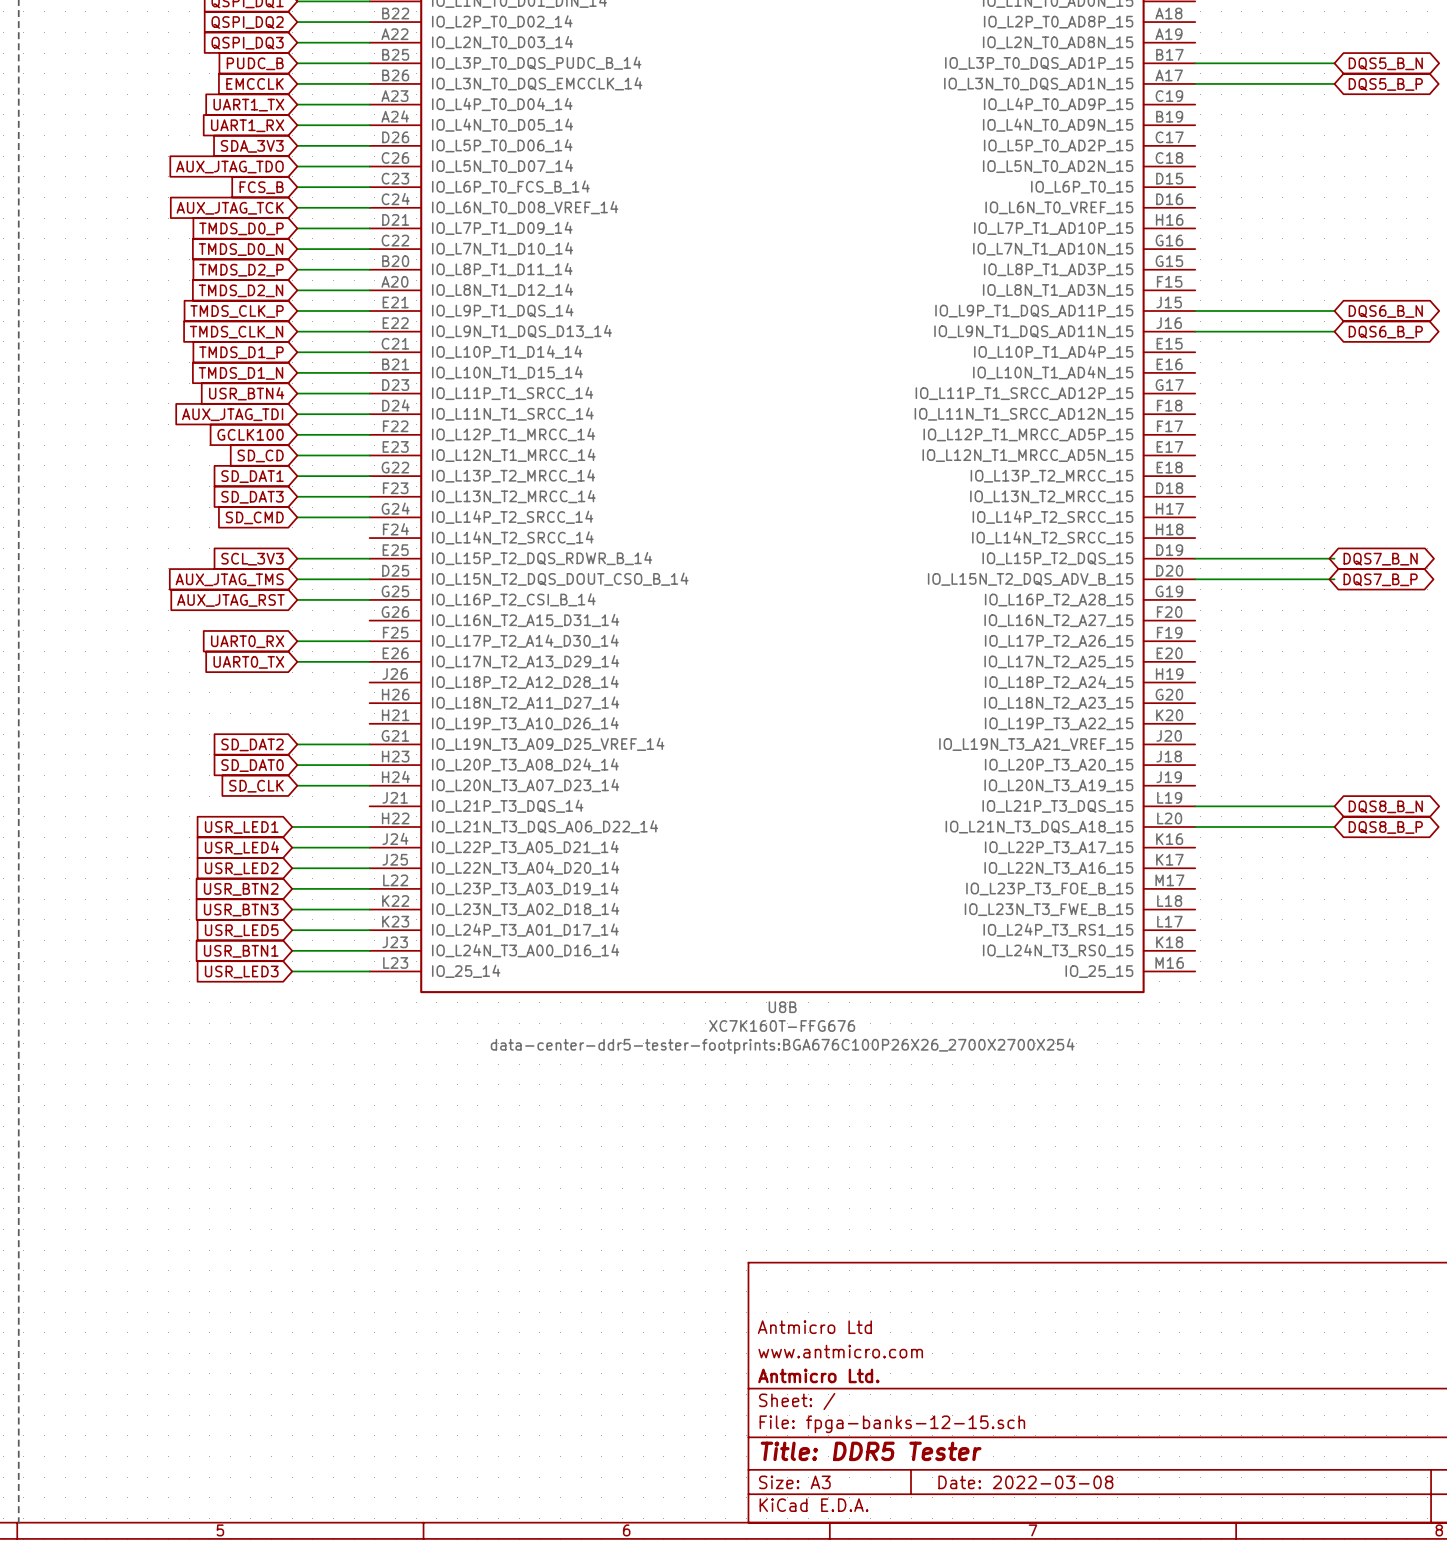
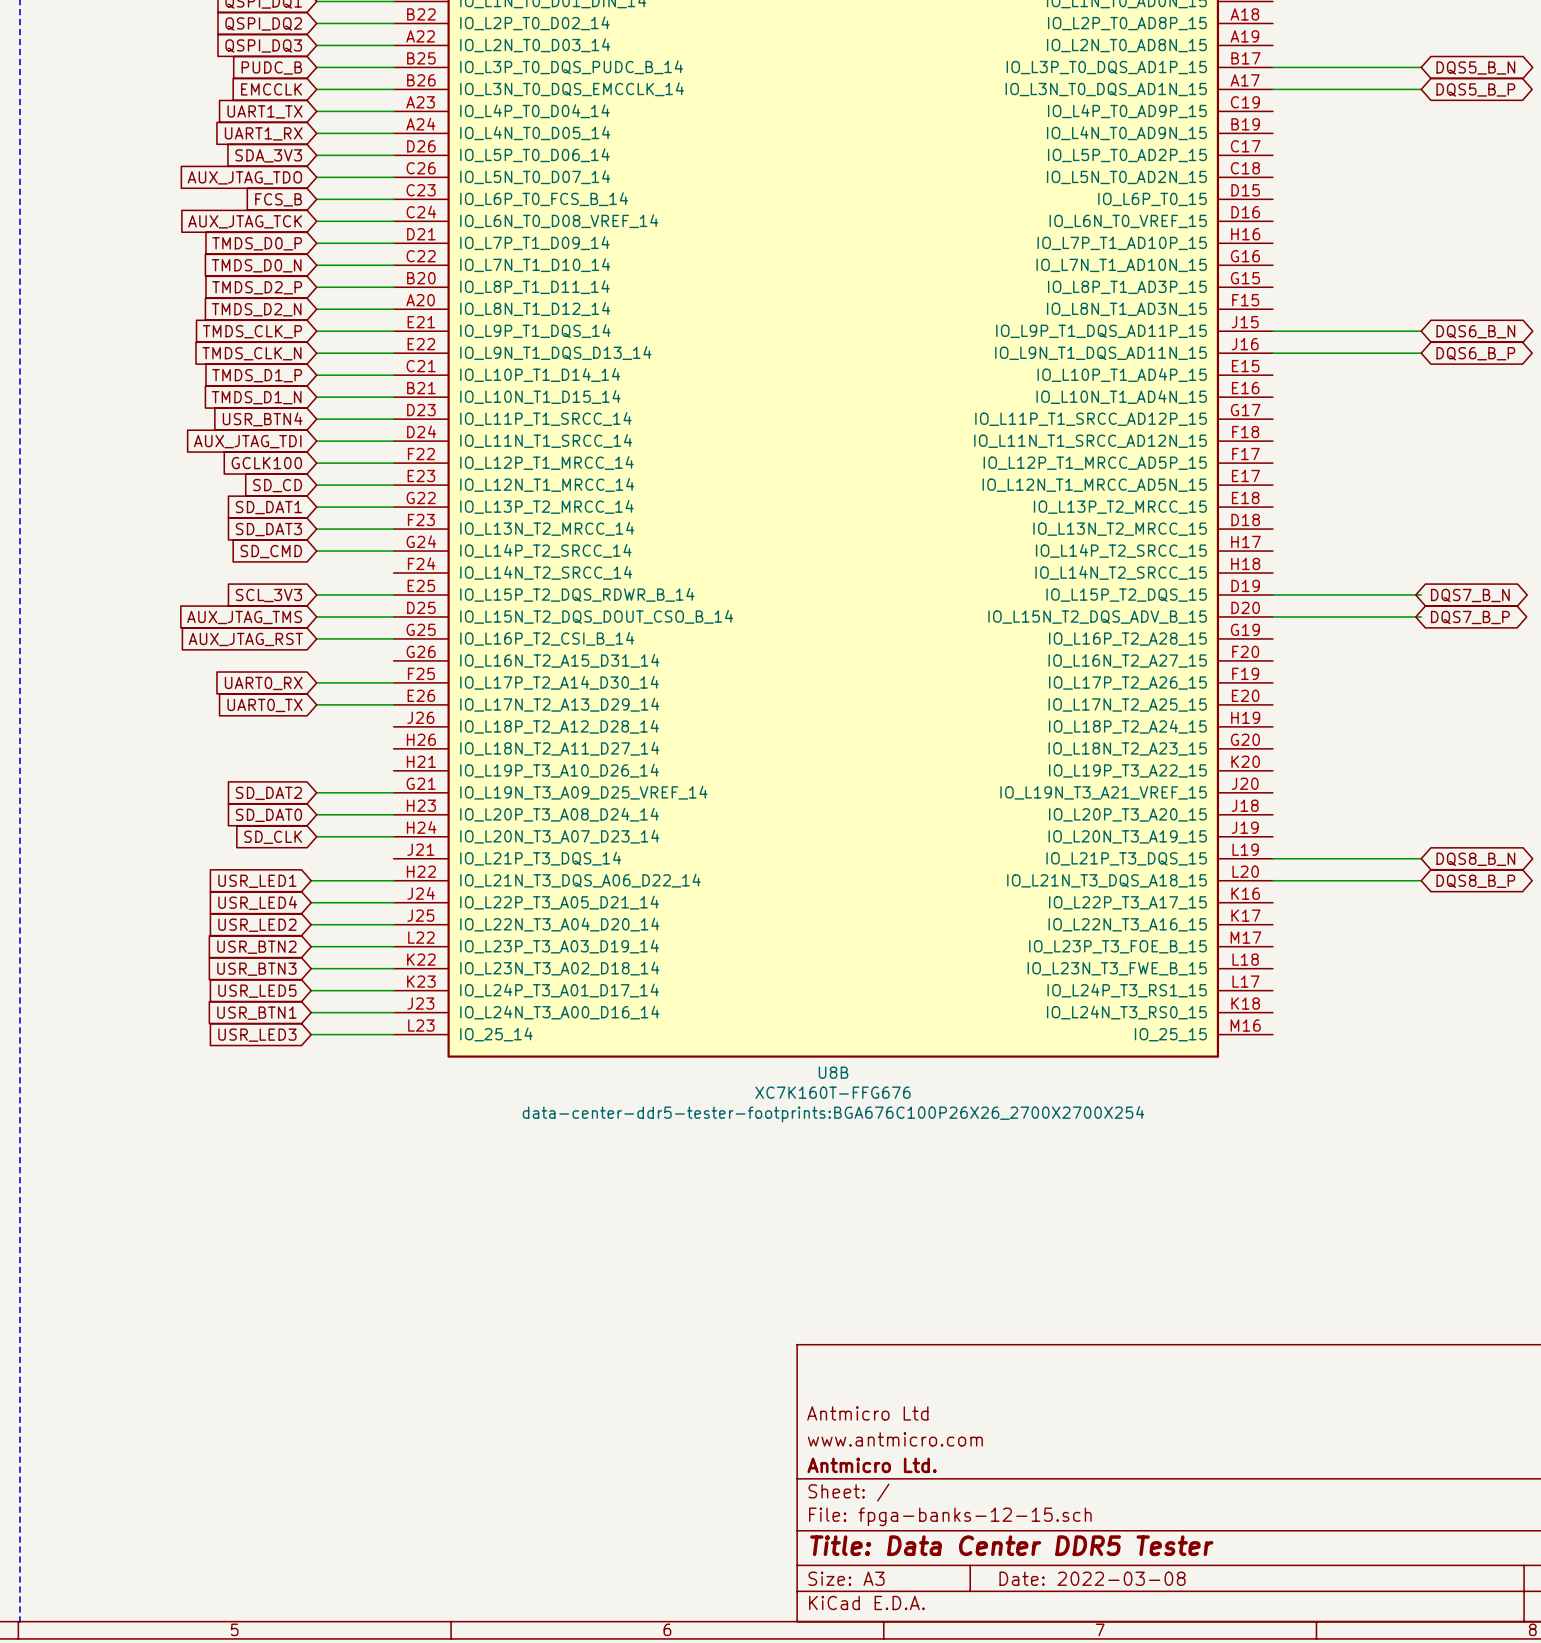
title block: Title: DDR5 Tester (871, 1451) -> Title: Data Center DDR5 Tester (1011, 1545)

